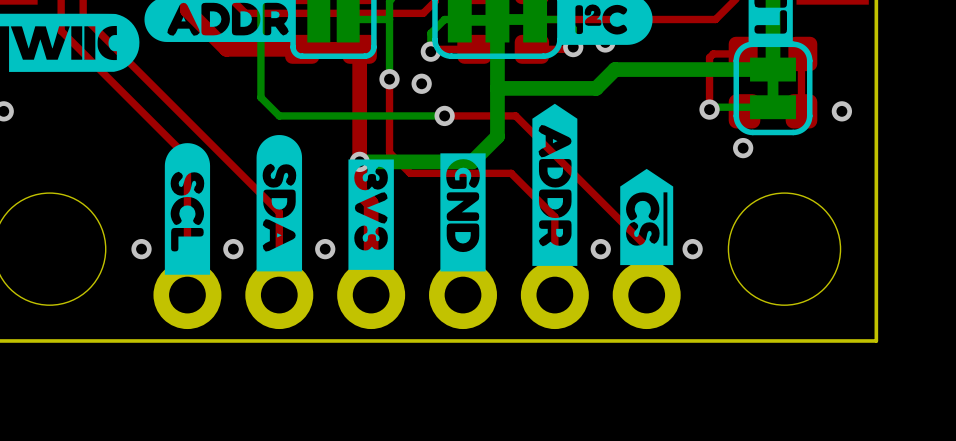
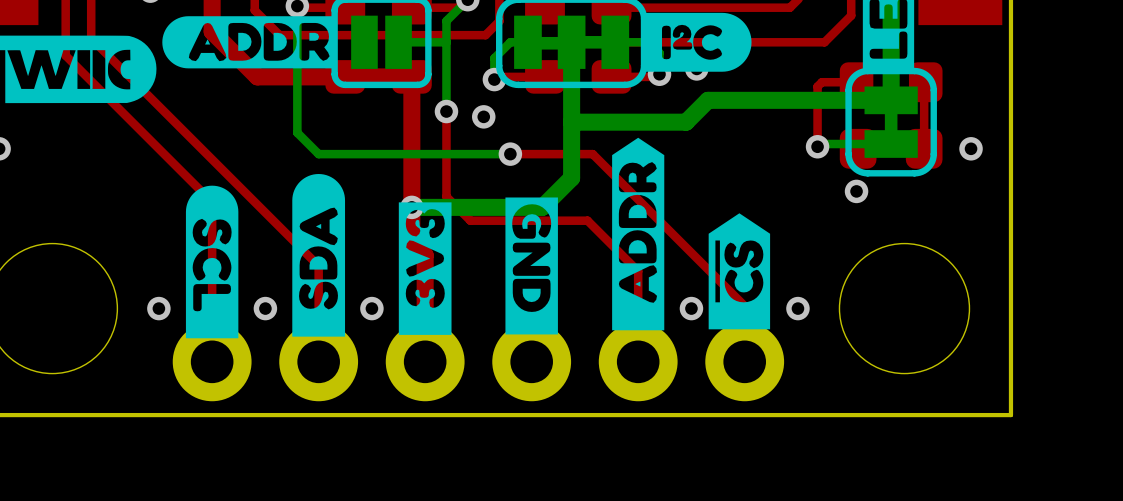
drawing shape: [532, 103, 578, 266] -> [612, 137, 665, 331]
drawing shape: [256, 135, 303, 272] -> [292, 173, 346, 337]
drawing shape: [348, 159, 394, 270] -> [398, 202, 452, 335]
drawing shape: [620, 168, 674, 266] -> [708, 213, 771, 330]

